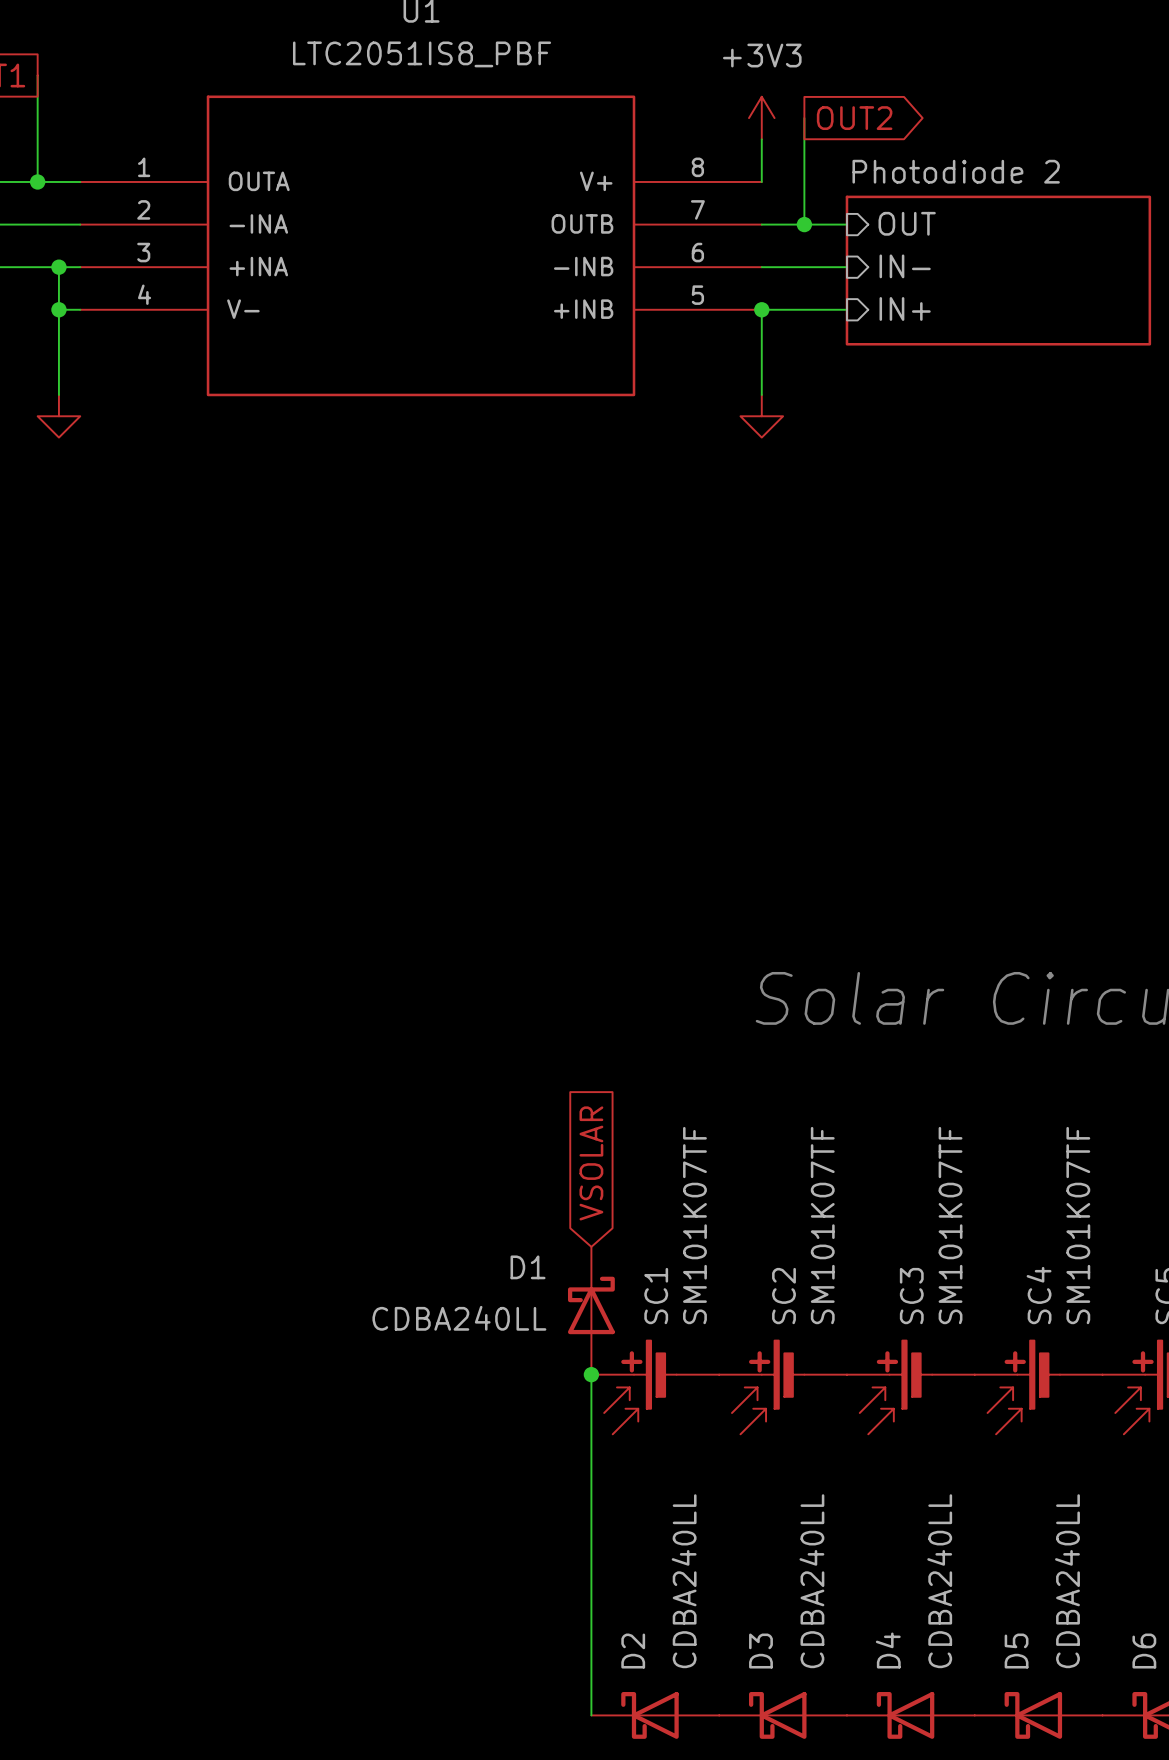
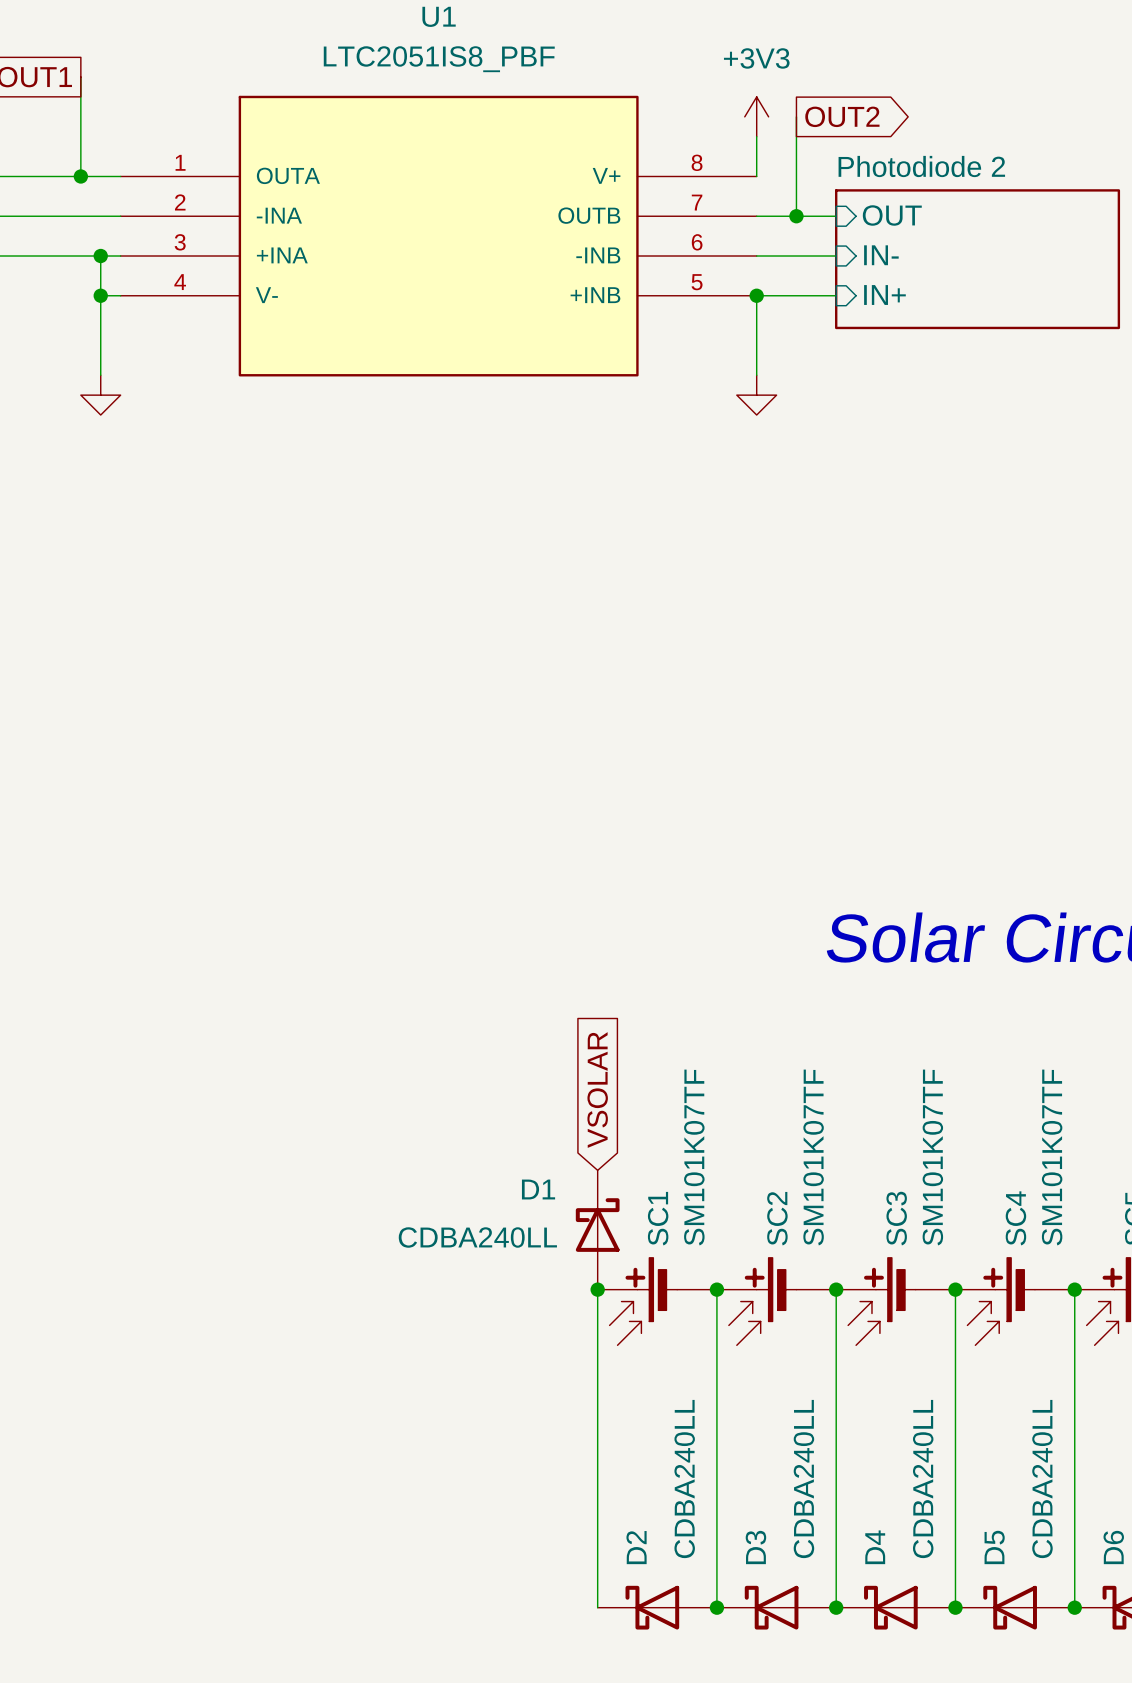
wire: none -> (716, 1289) (716, 1607)
junction: none -> (716, 1289)
wire: none -> (836, 1289) (836, 1607)
junction: none -> (836, 1289)
wire: none -> (955, 1289) (955, 1607)
junction: none -> (955, 1289)
wire: none -> (1074, 1289) (1074, 1607)
junction: none -> (1074, 1289)
junction: none -> (716, 1607)
junction: none -> (836, 1607)
junction: none -> (955, 1607)
junction: none -> (1074, 1607)

